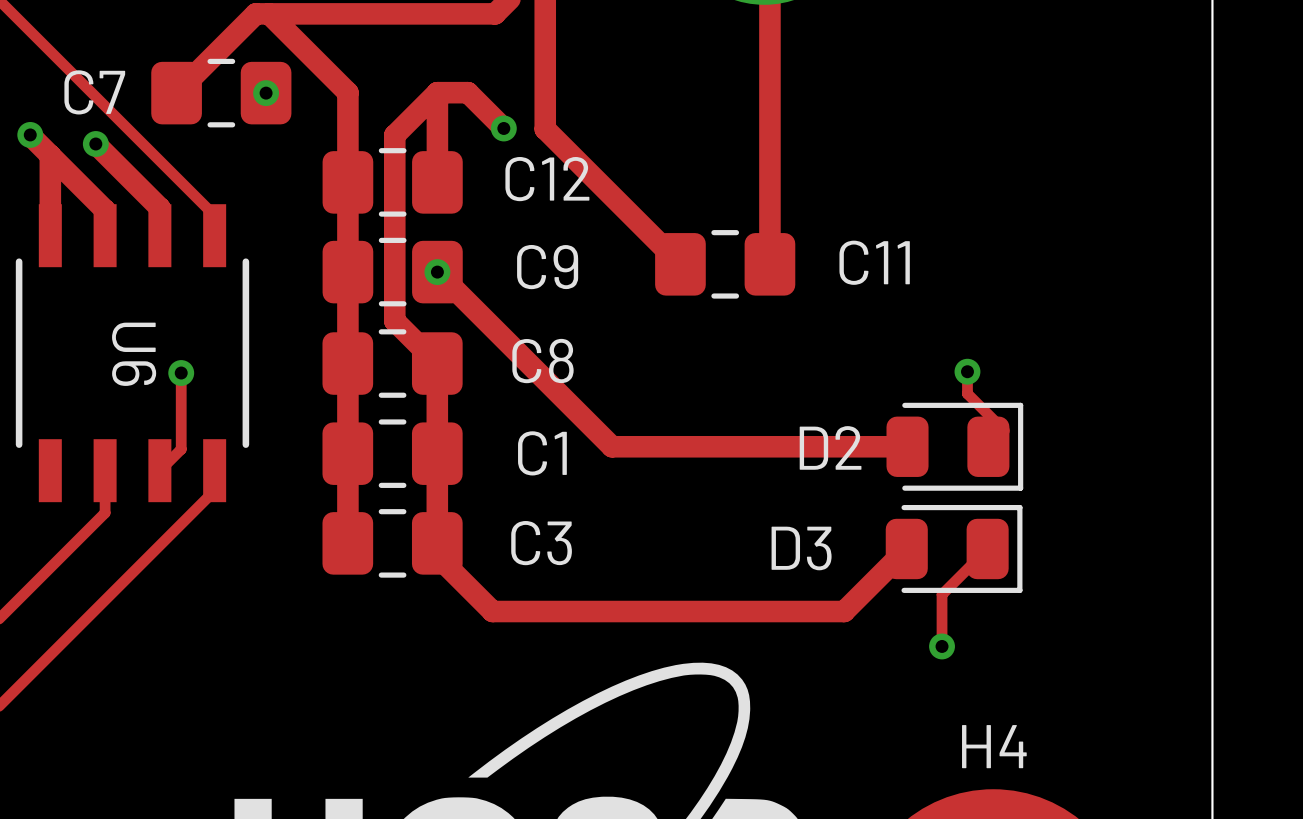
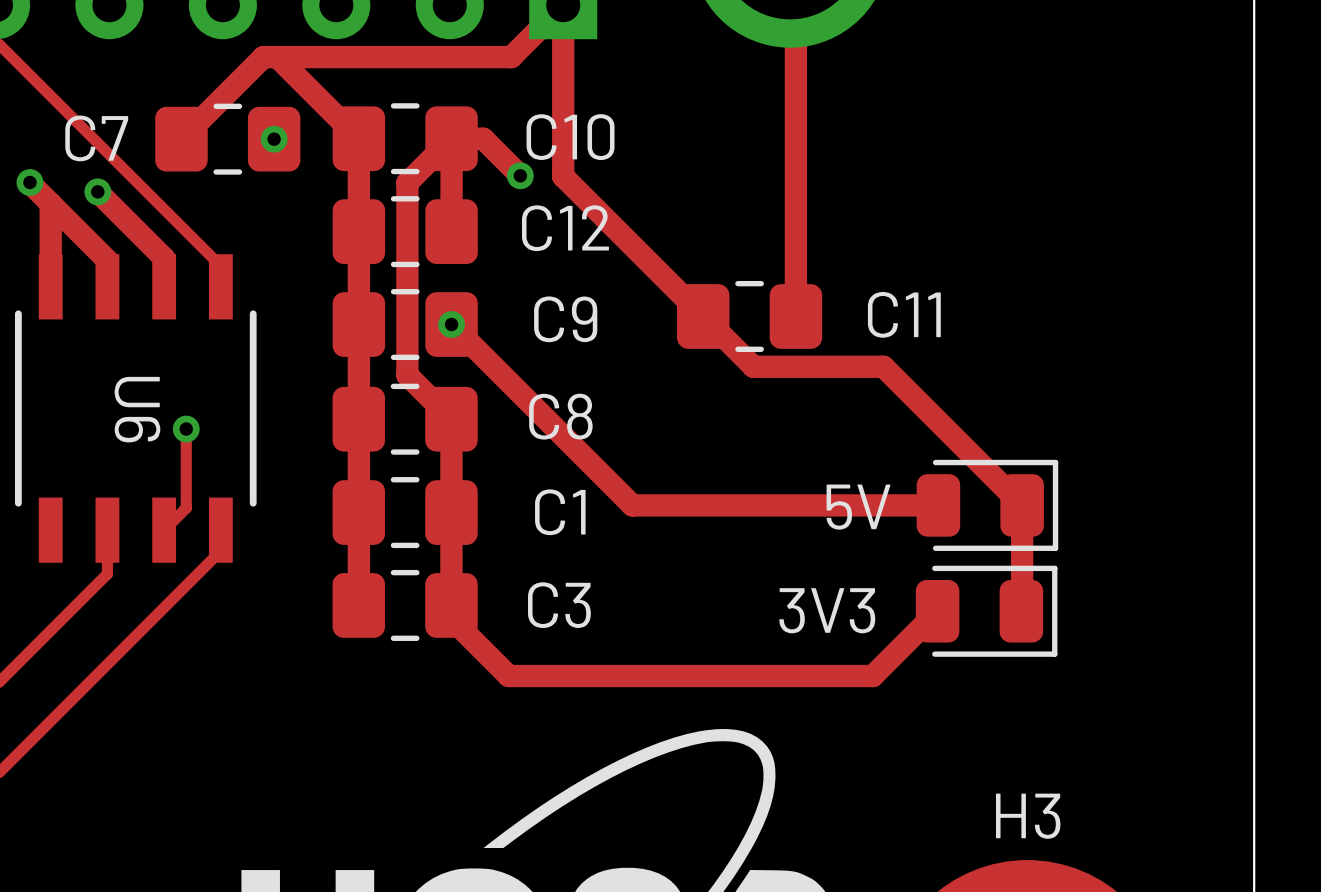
C10: none -> (405, 138)
track: none -> (703, 316) (753, 366) (883, 366) (1022, 505) (1021, 611)
track: (967, 371) (967, 393) (1004, 430) -> none
via: (967, 371) -> none
D2 name: D2 (830, 447) -> 5V (858, 507)
D3 name: D3 (801, 548) -> 3V3 (827, 610)
track: (971, 565) (942, 594) (942, 646) -> none
via: (942, 646) -> none
H4 name: H4 (994, 746) -> H3 (1028, 816)

